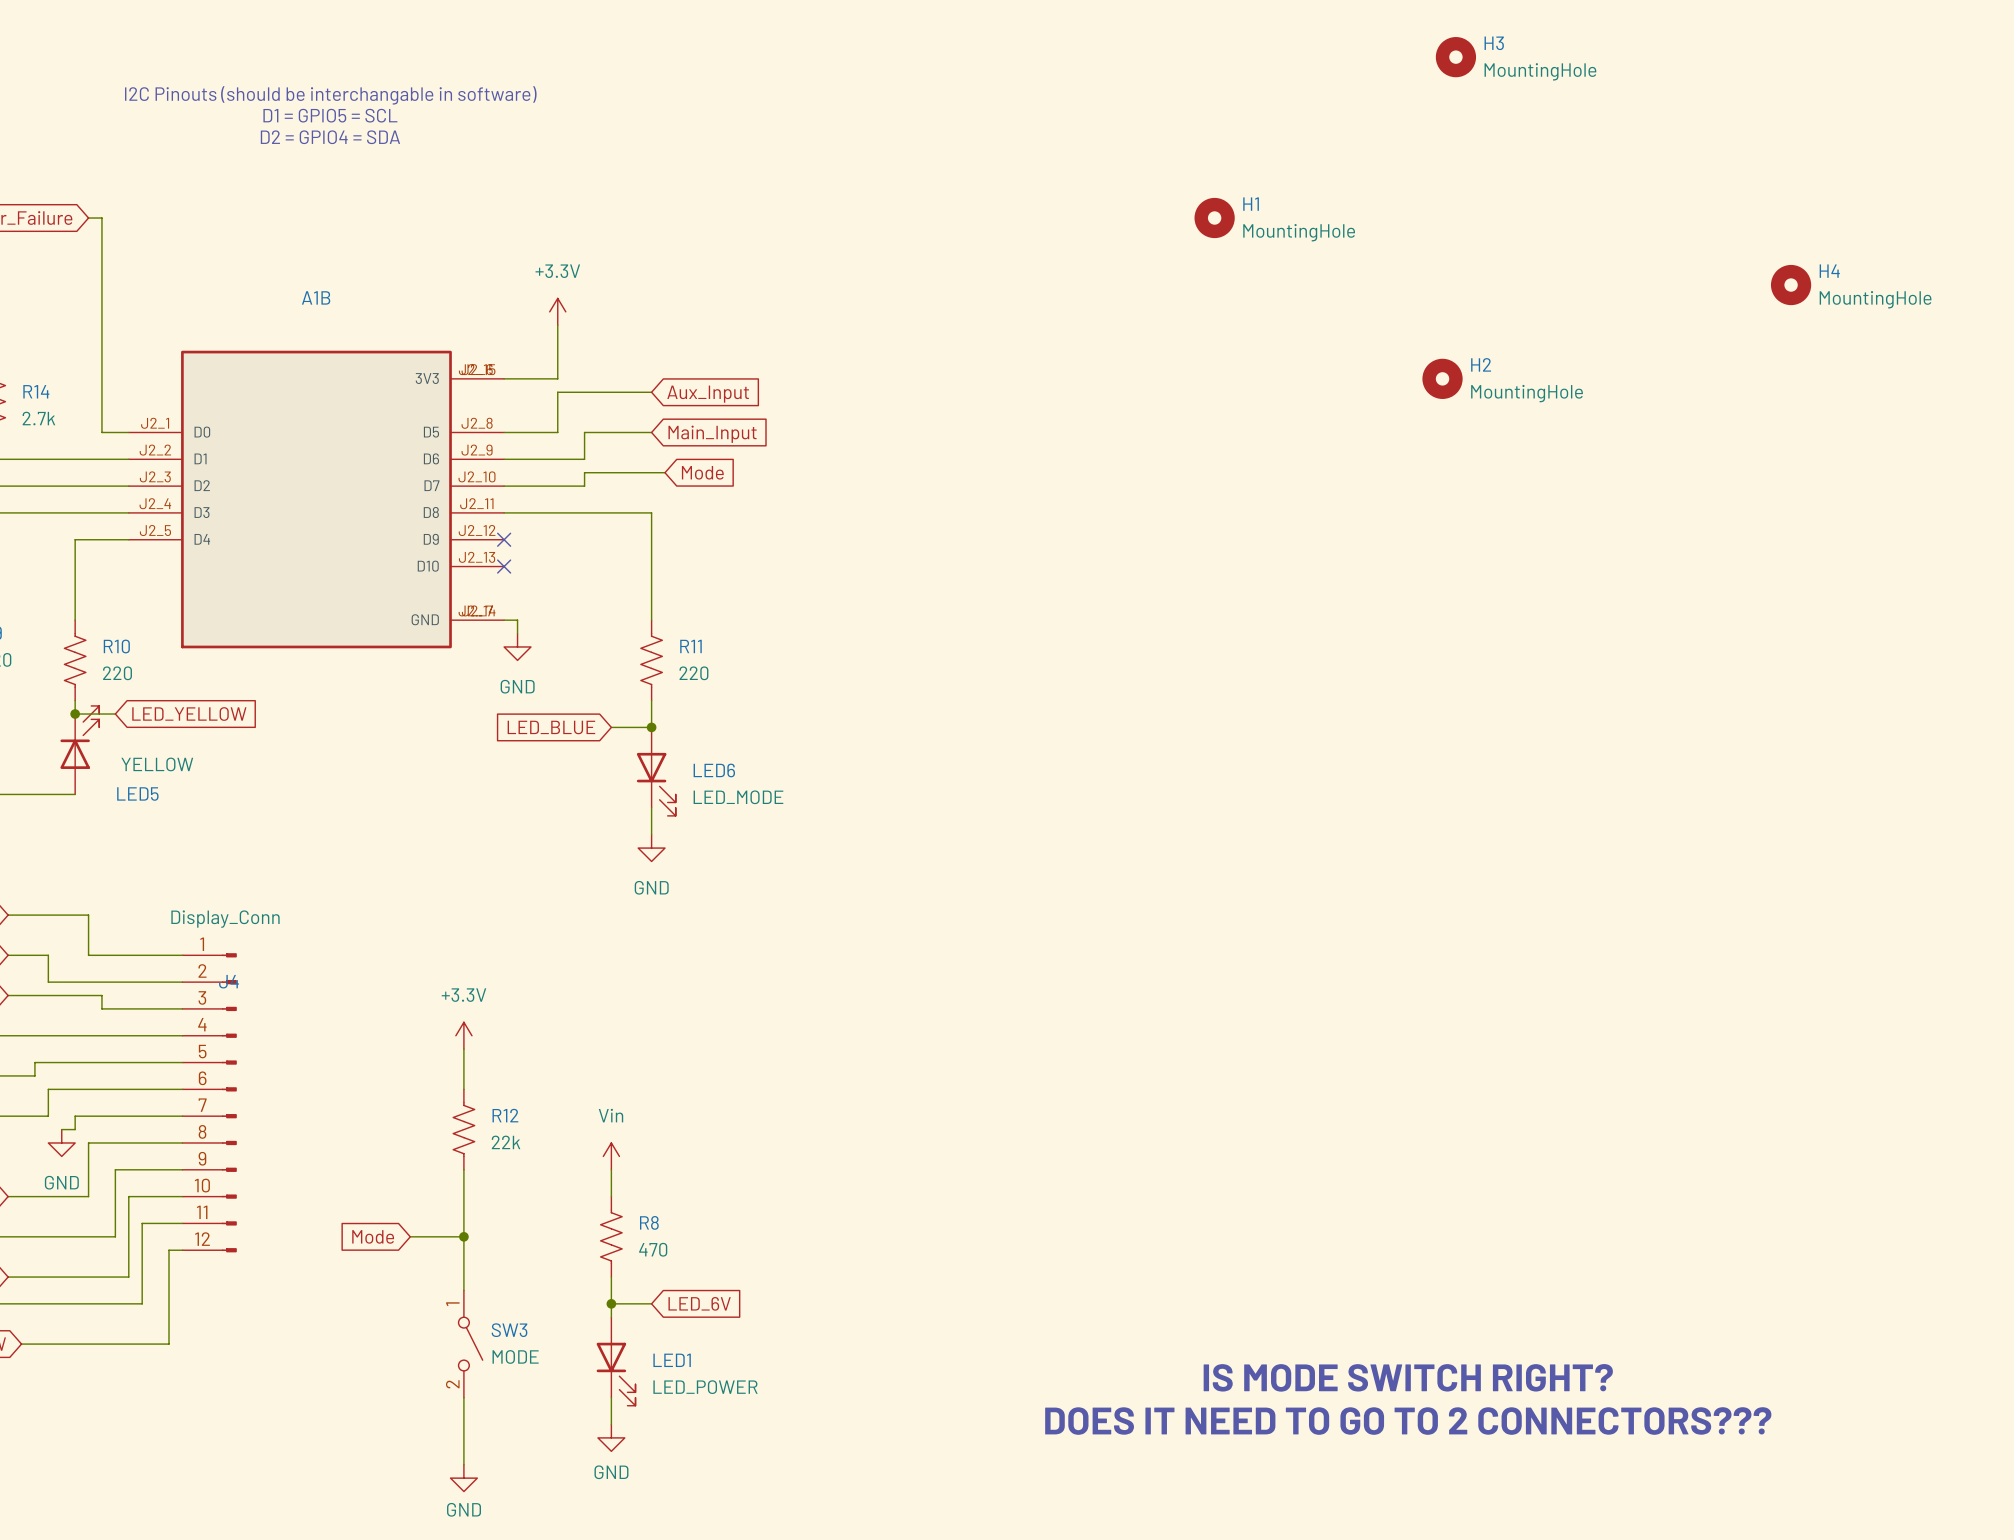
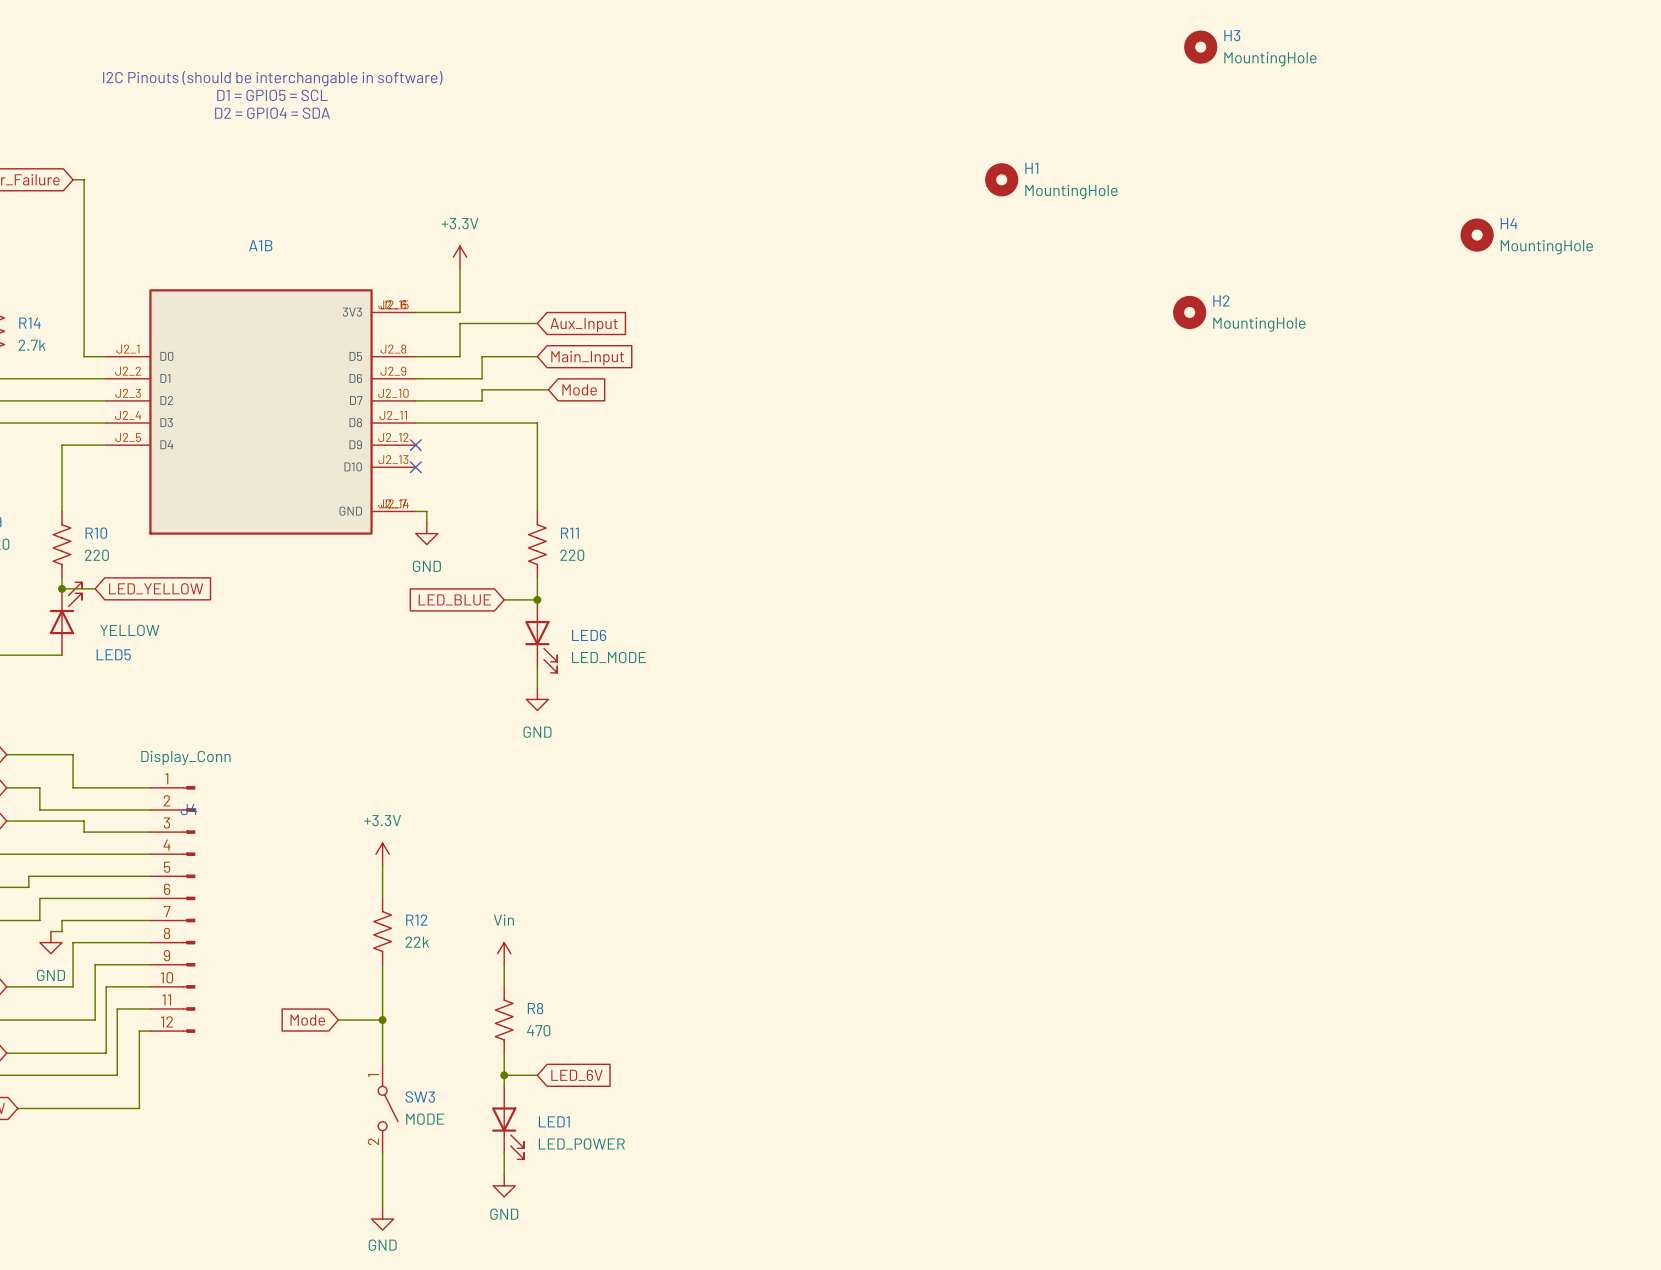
text: IS MODE SWITCH RIGHT? (1408, 1377) -> none
text: DOES IT NEED TO GO TO 2 CONNECTORS??? (1408, 1421) -> none

